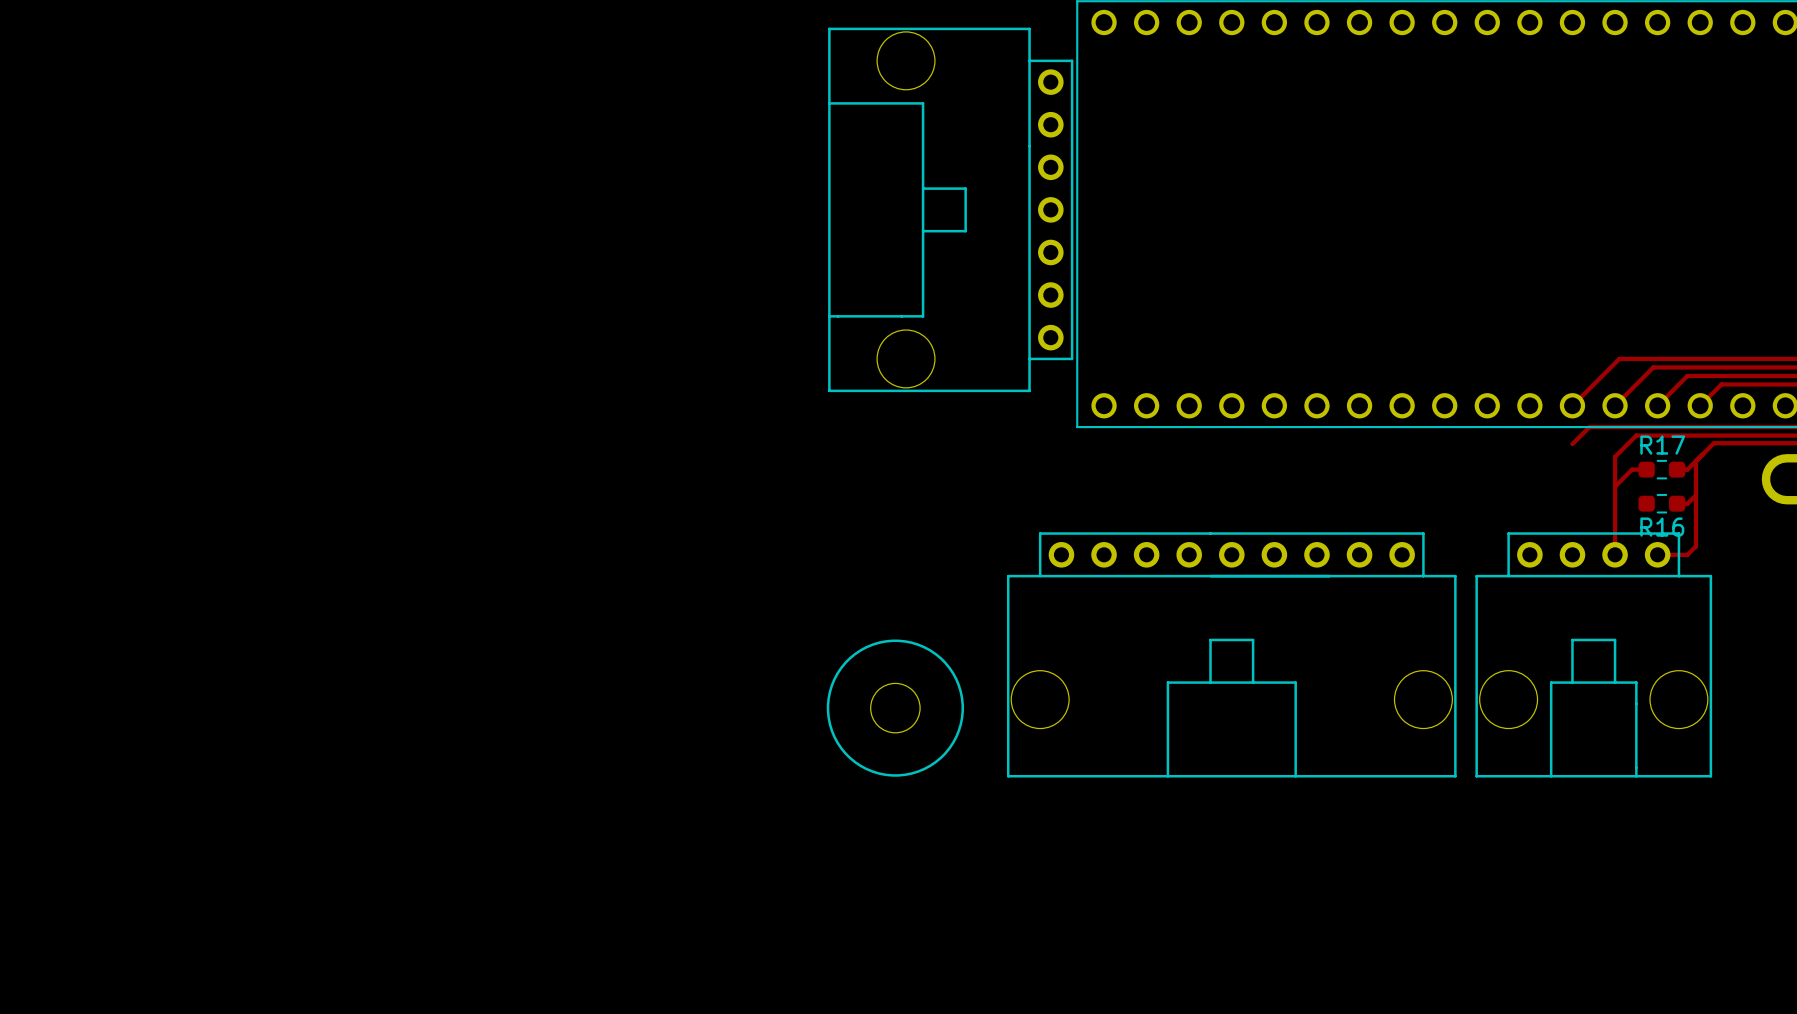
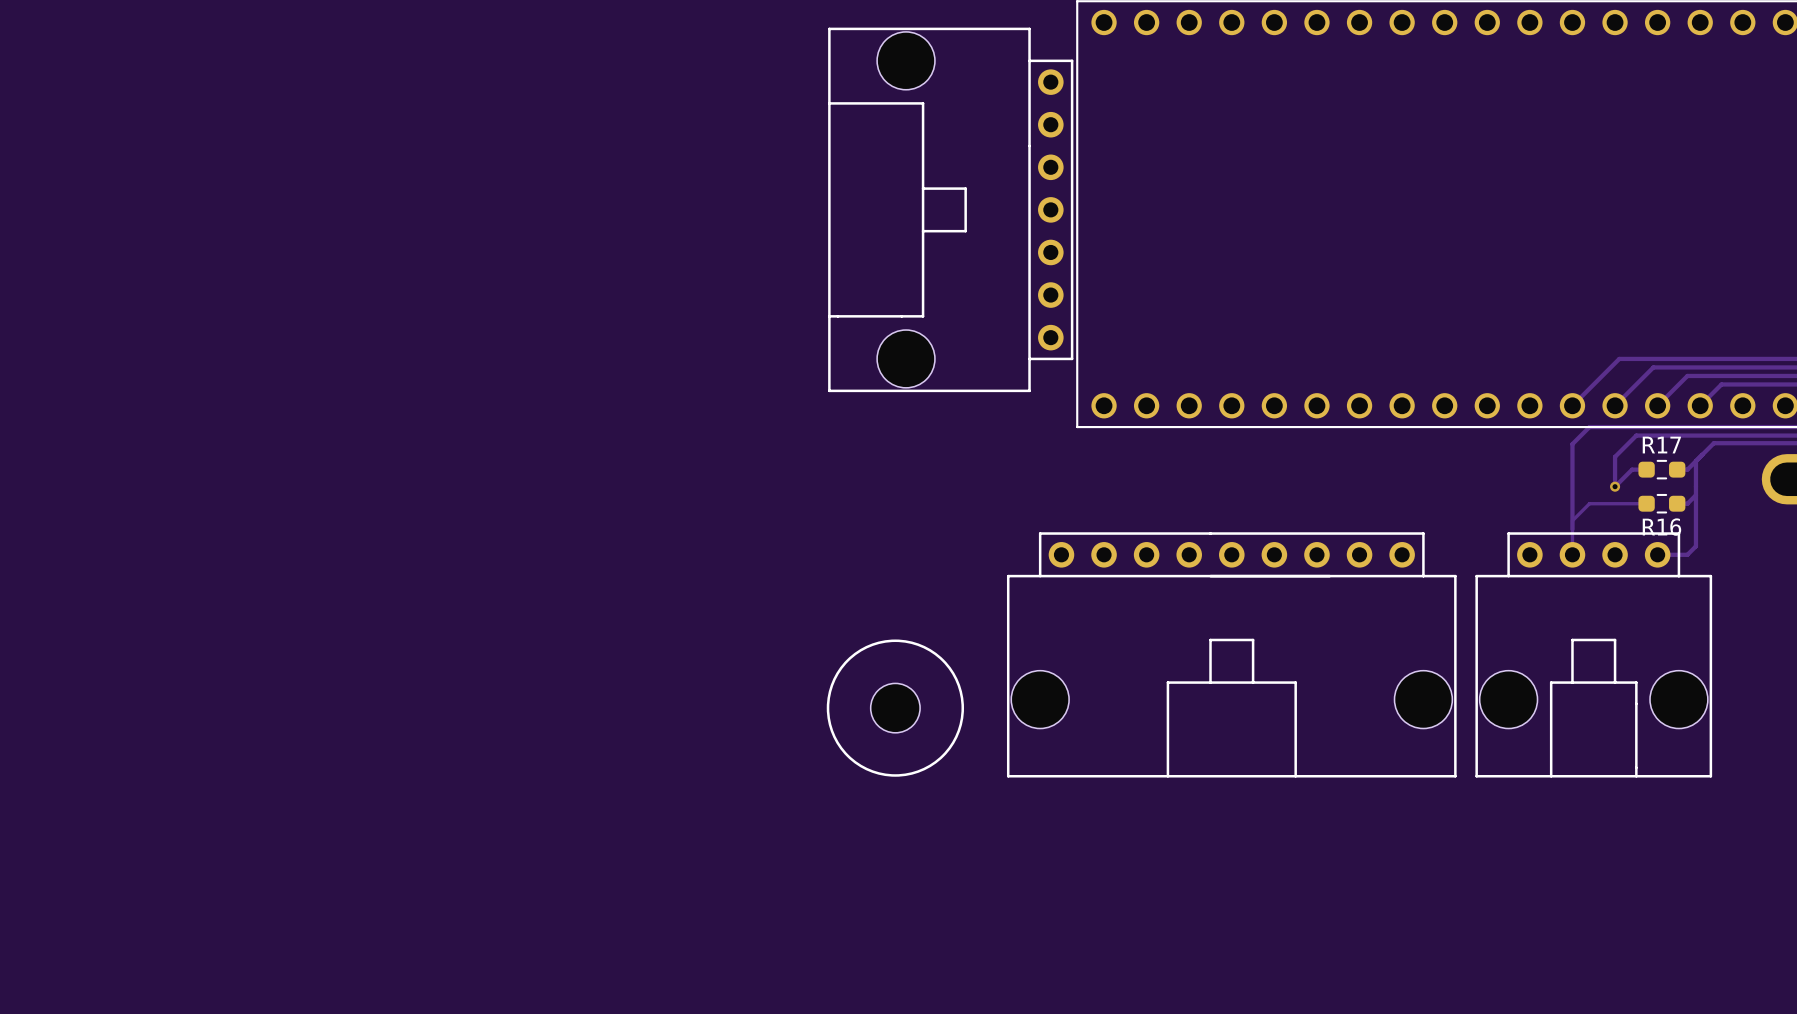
track: none -> (1572, 444) (1572, 529)
track: (1615, 486) (1615, 554) -> none
via: none -> (1615, 486)
track: none -> (1646, 503) (1589, 503) (1572, 520) (1572, 554)

